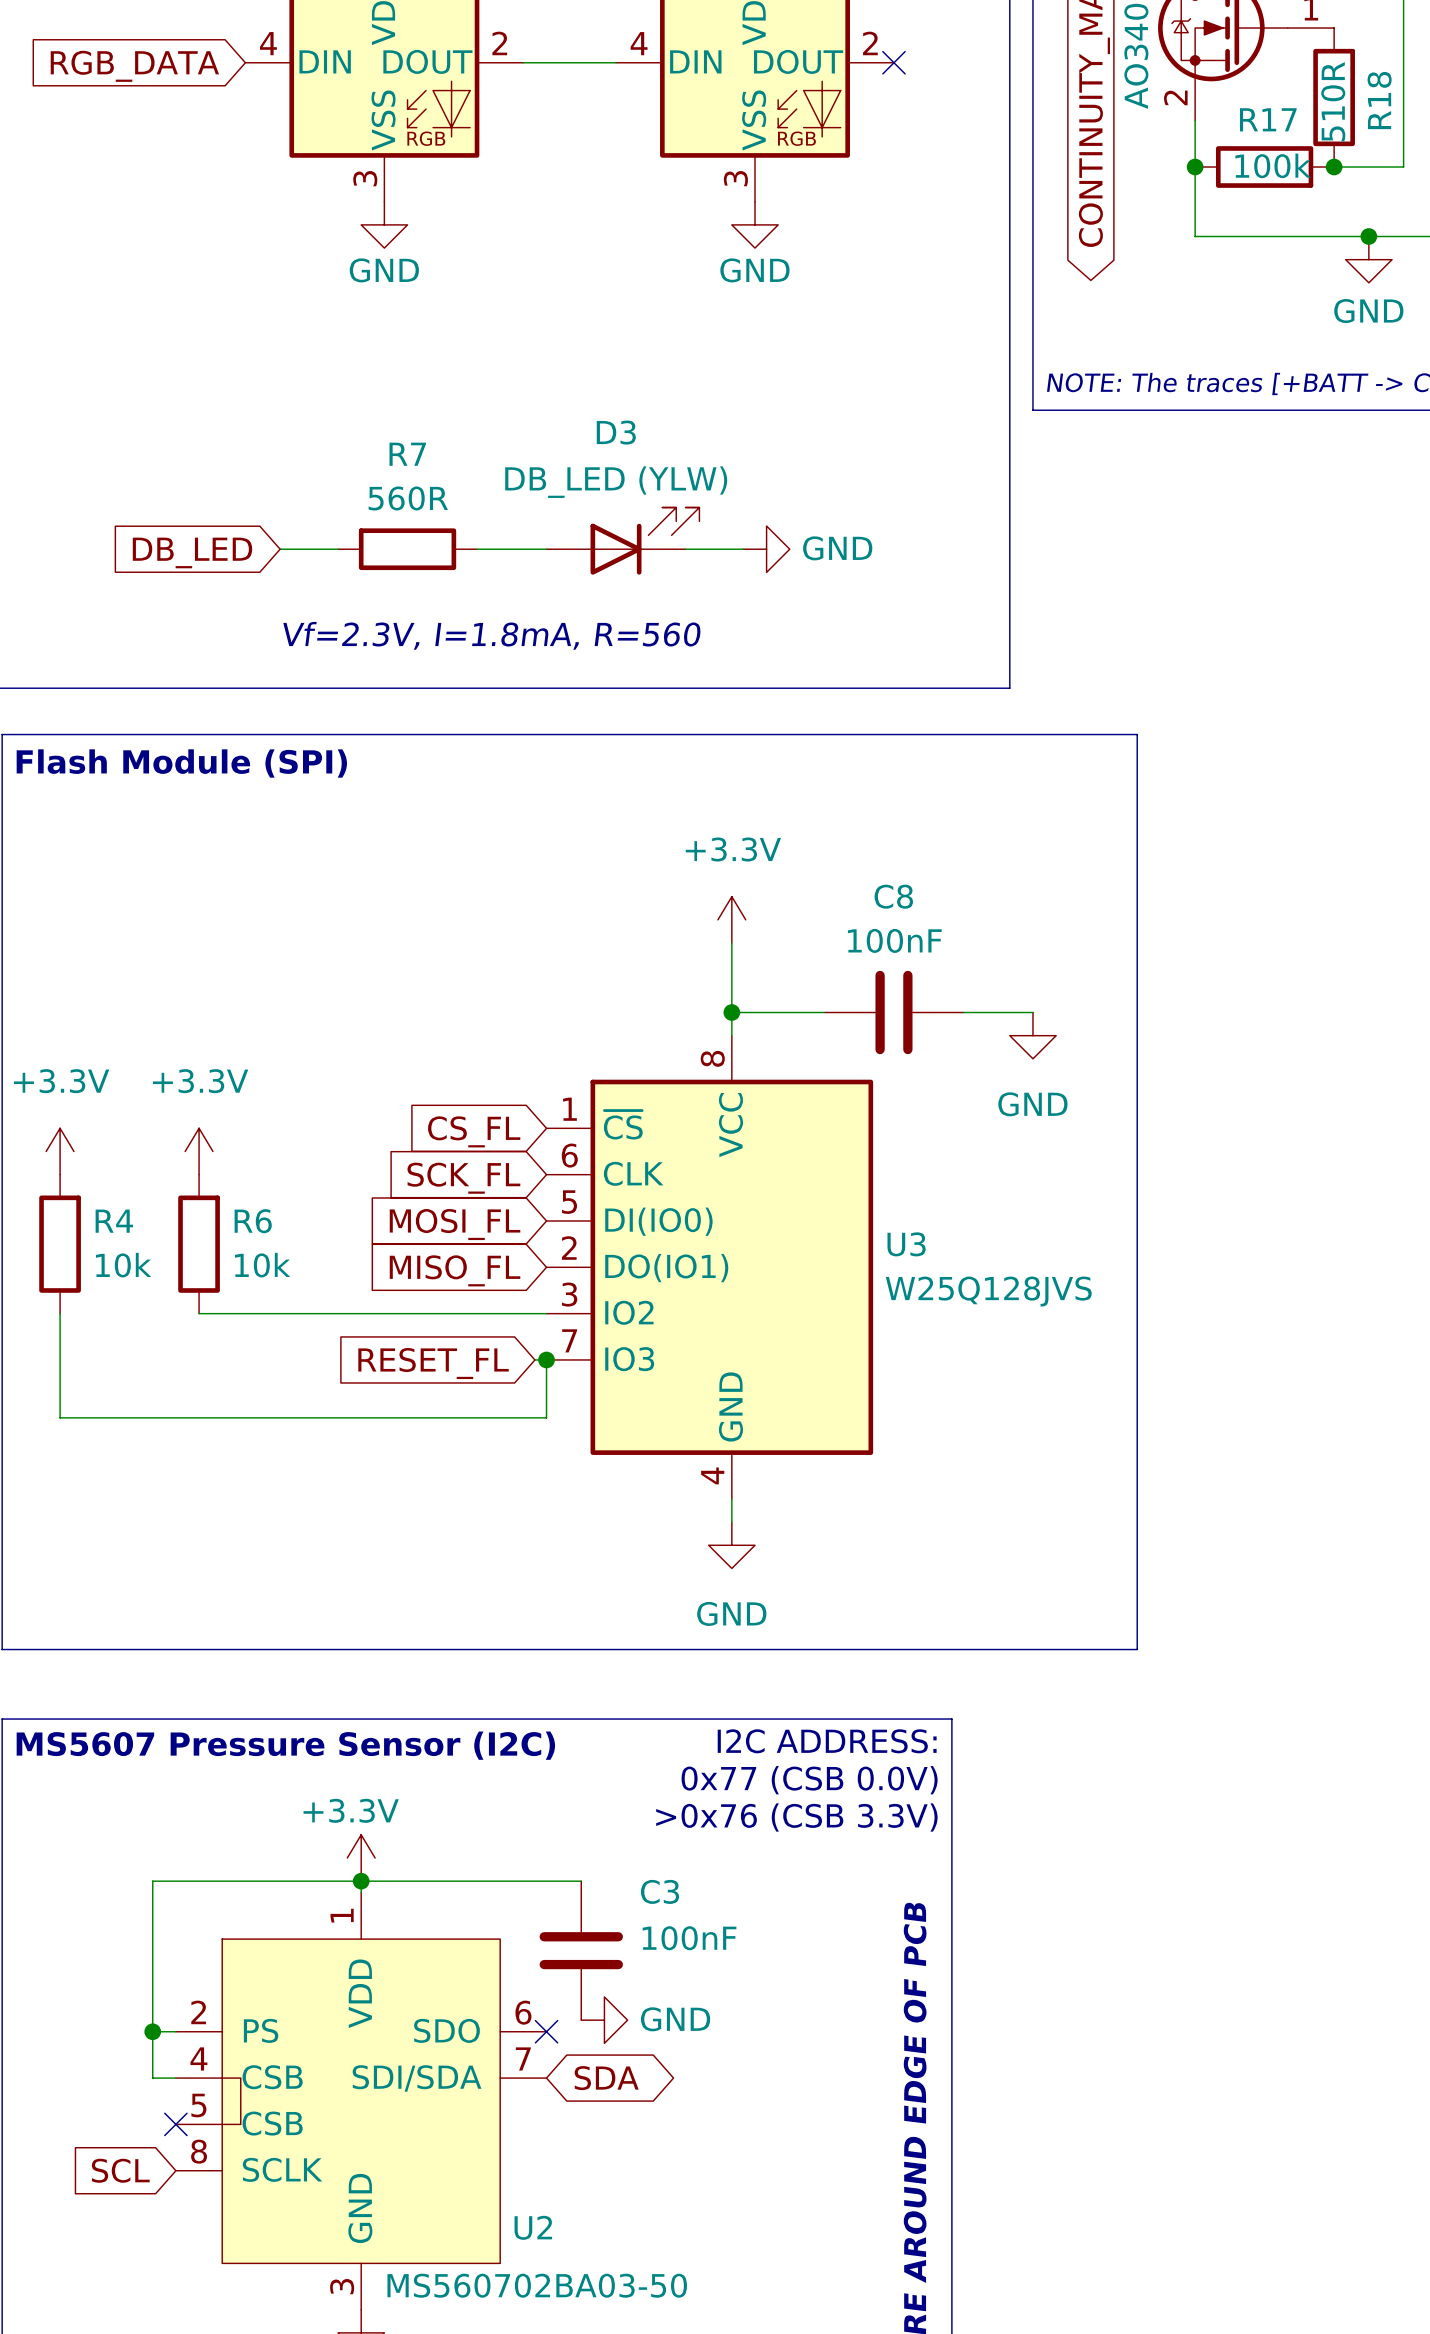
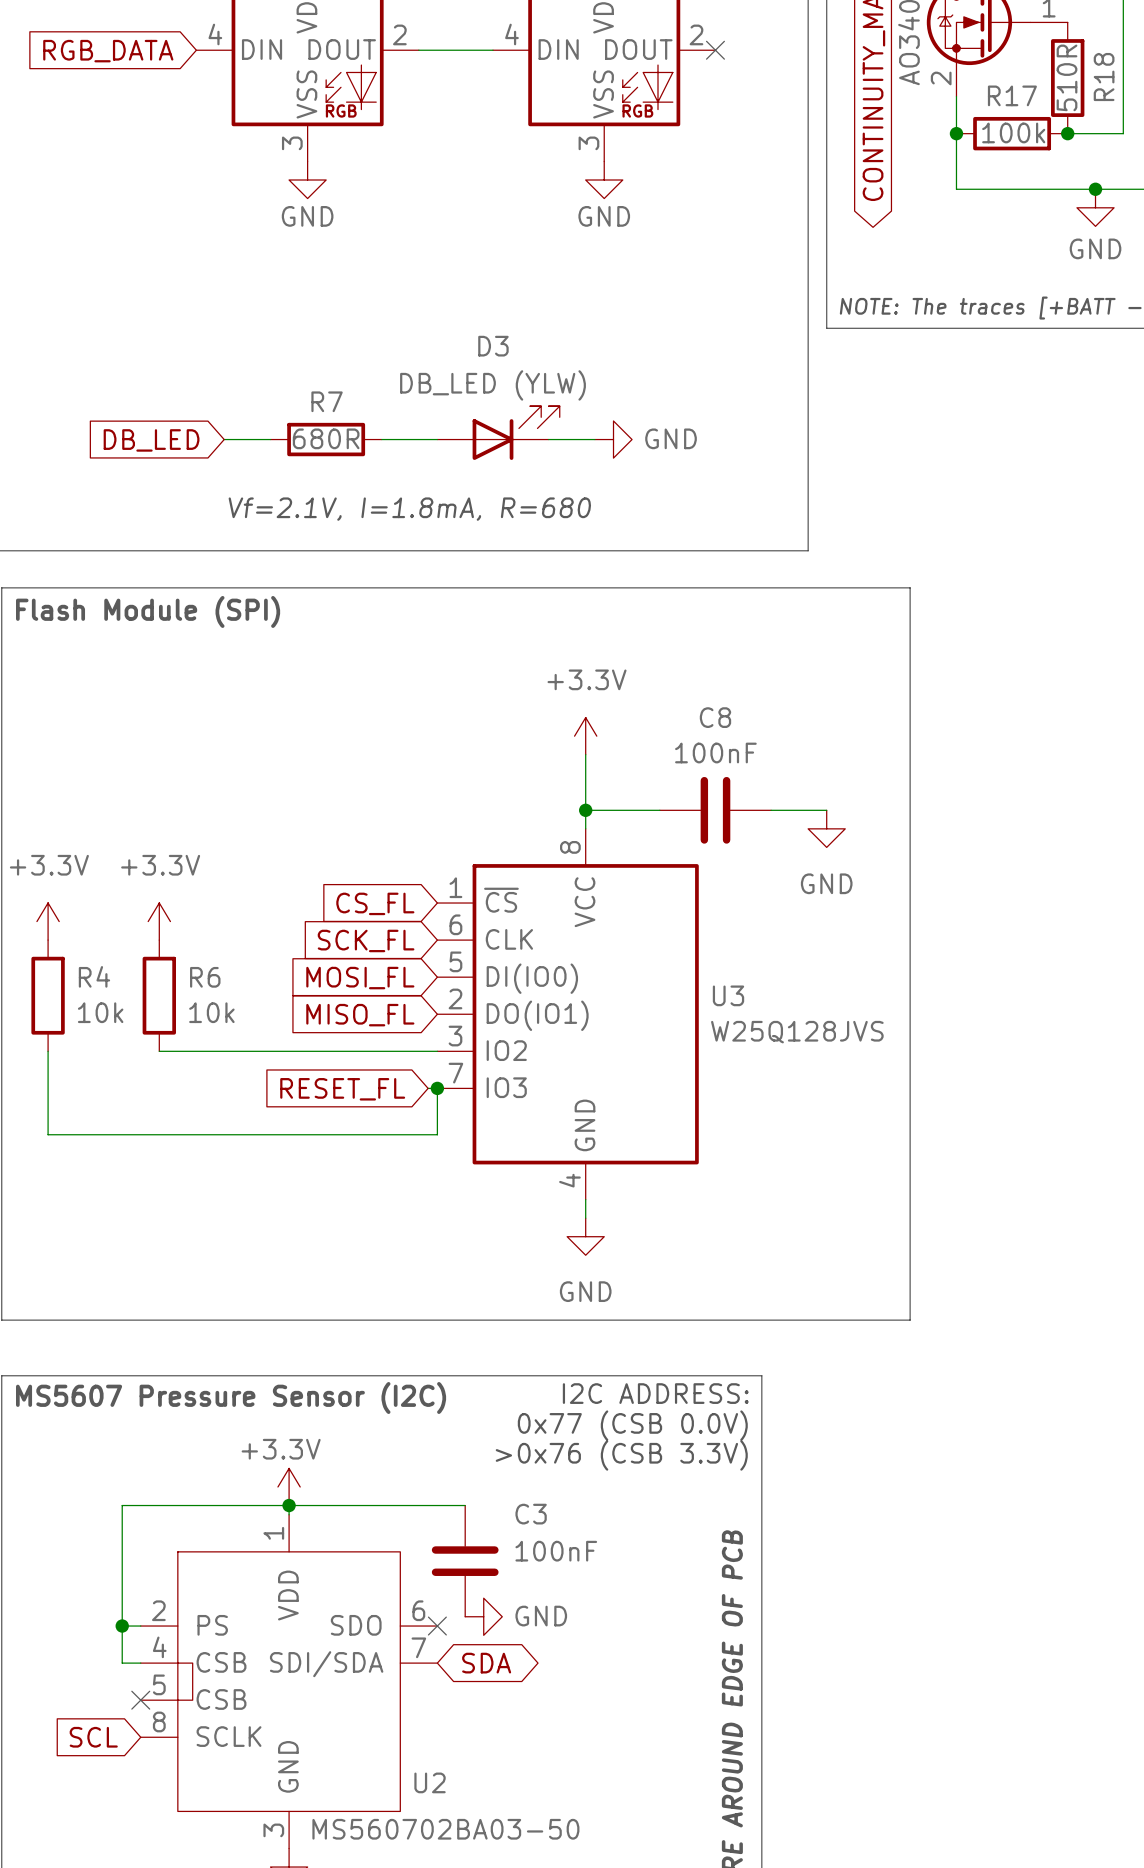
R7 name position: R7 (407, 454) -> R7 (327, 401)
R7 value: 560R (408, 498) -> 680R (326, 438)
text: Vf=2.3V, I=1.8mA, R=560 (492, 635) -> Vf=2.1V, I=1.8mA, R=680 (409, 509)

